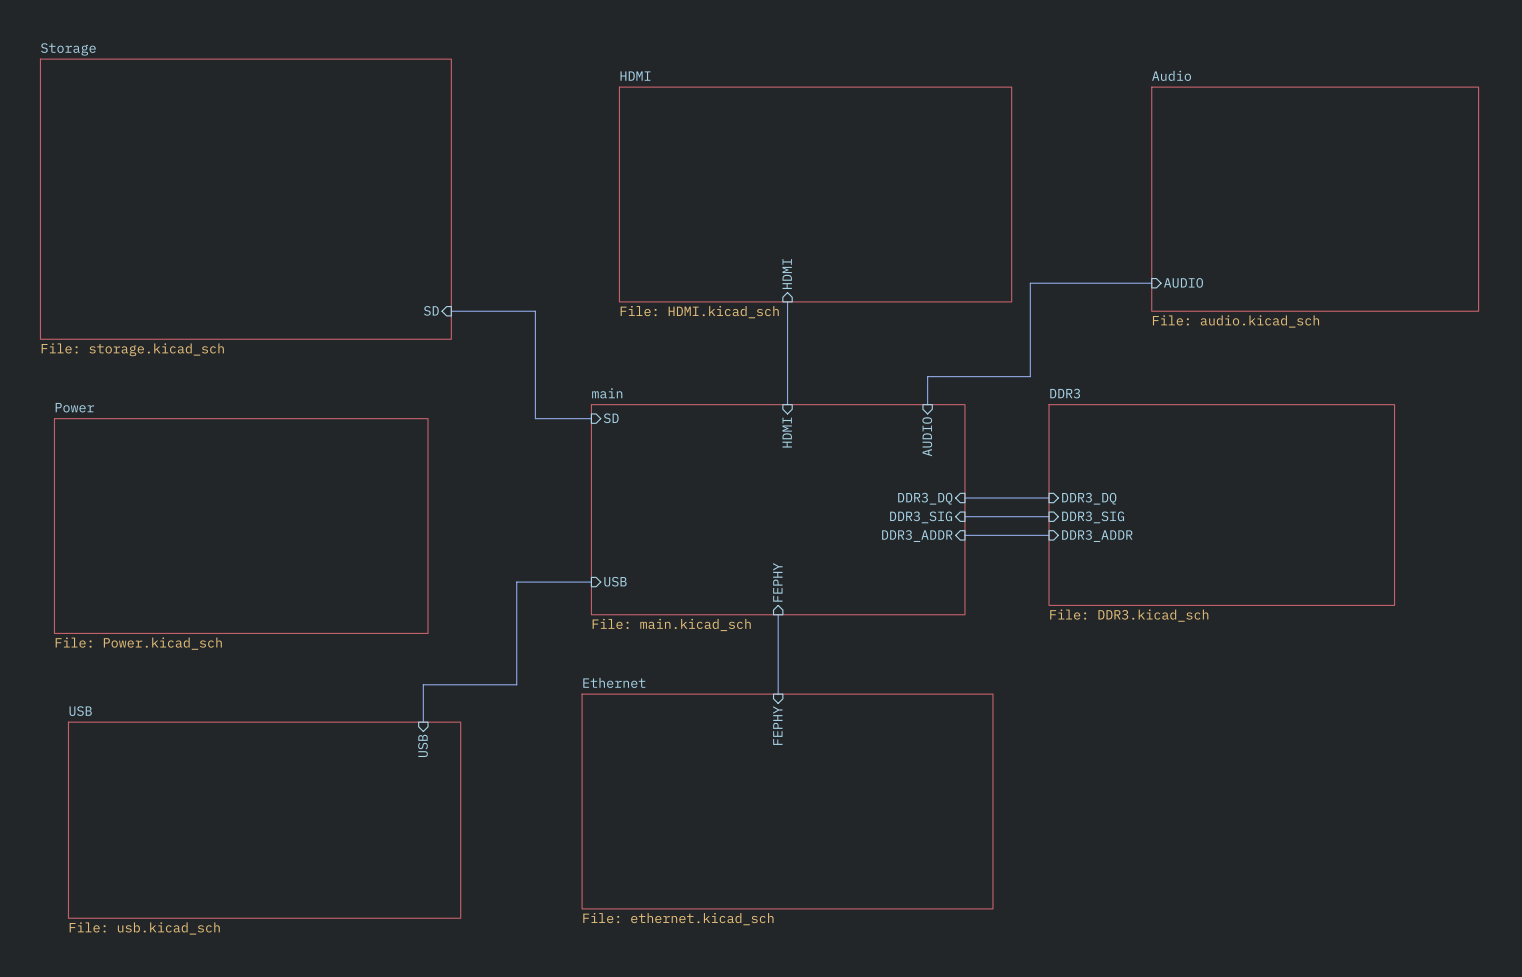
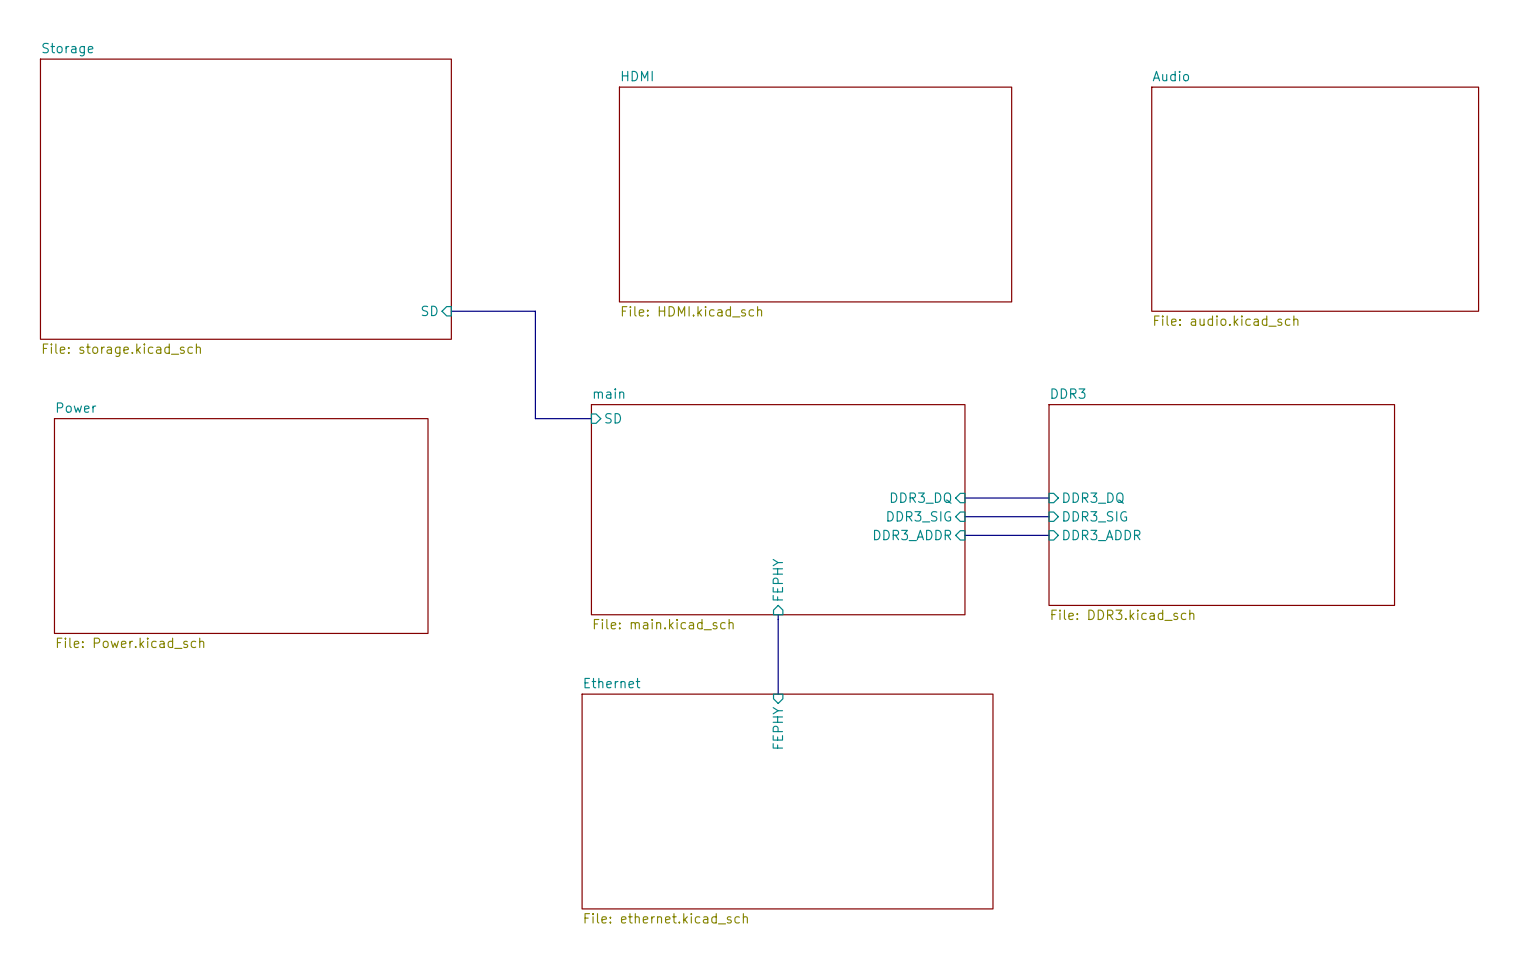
sheet pin: HDMI (787, 274) -> none
sheet pin: AUDIO (1183, 282) -> none
bus: (1151, 283) (1030, 283) (1030, 376) (927, 376) (927, 404) -> none
bus: (787, 301) (787, 404) -> none
sheet pin: HDMI (787, 432) -> none
sheet pin: AUDIO (927, 436) -> none
sheet pin: USB (615, 581) -> none
bus: (591, 582) (516, 582) (516, 684) (423, 684) (423, 722) -> none
sheet pin: USB (422, 745) -> none
sheet USB: File: usb.kicad_sch (264, 820) -> none

